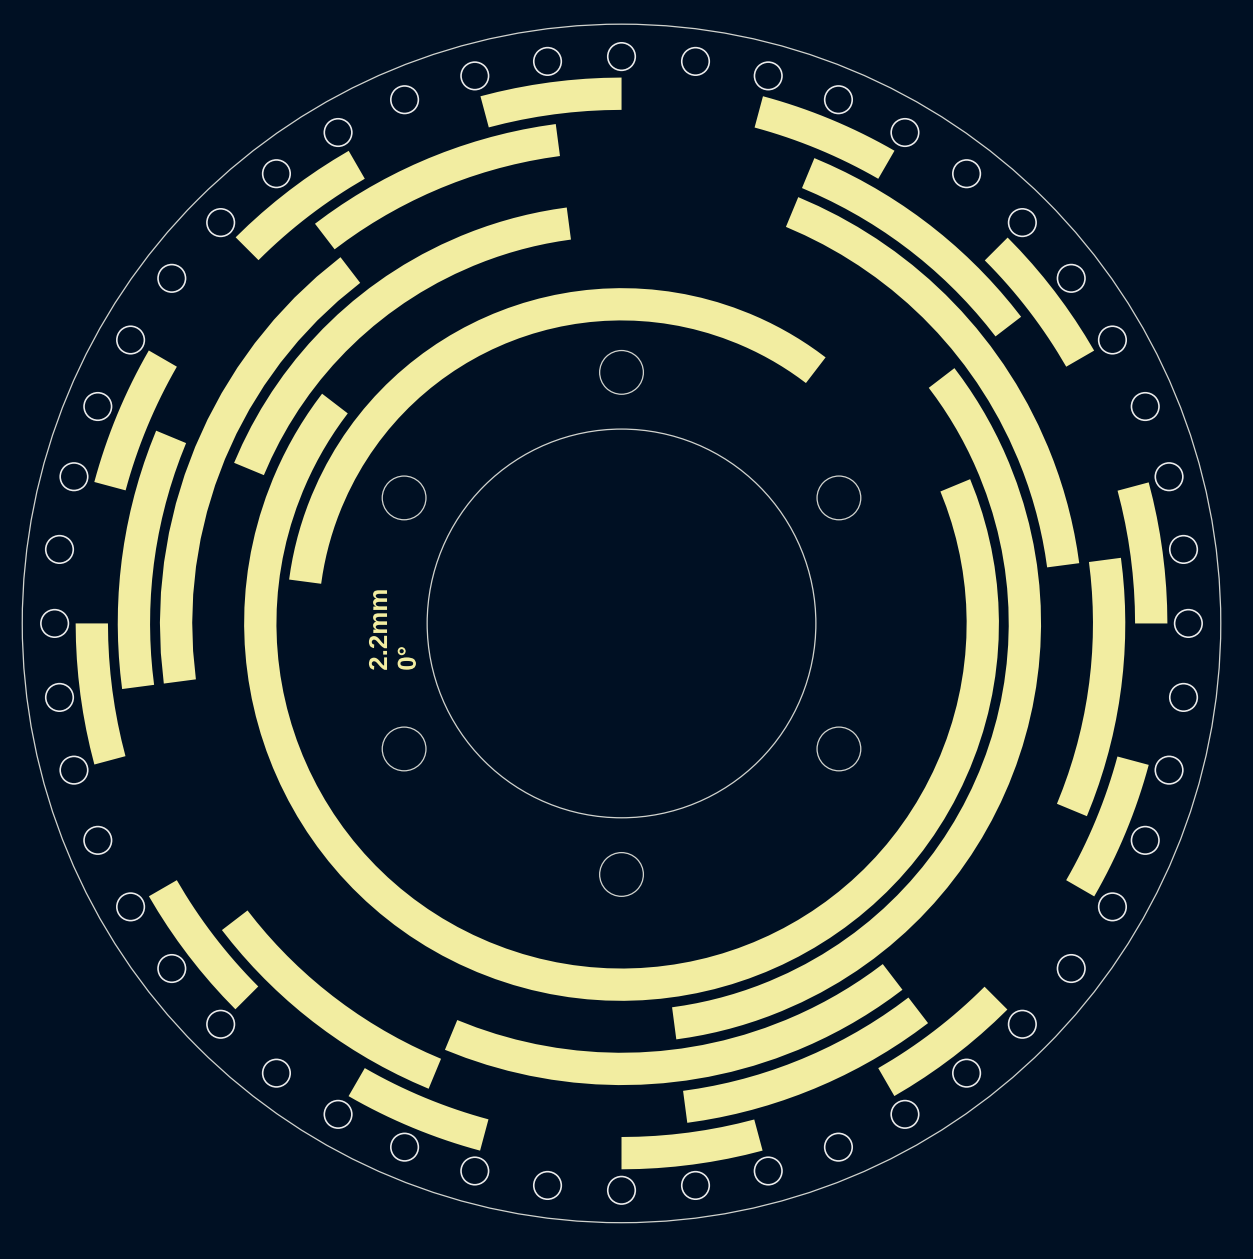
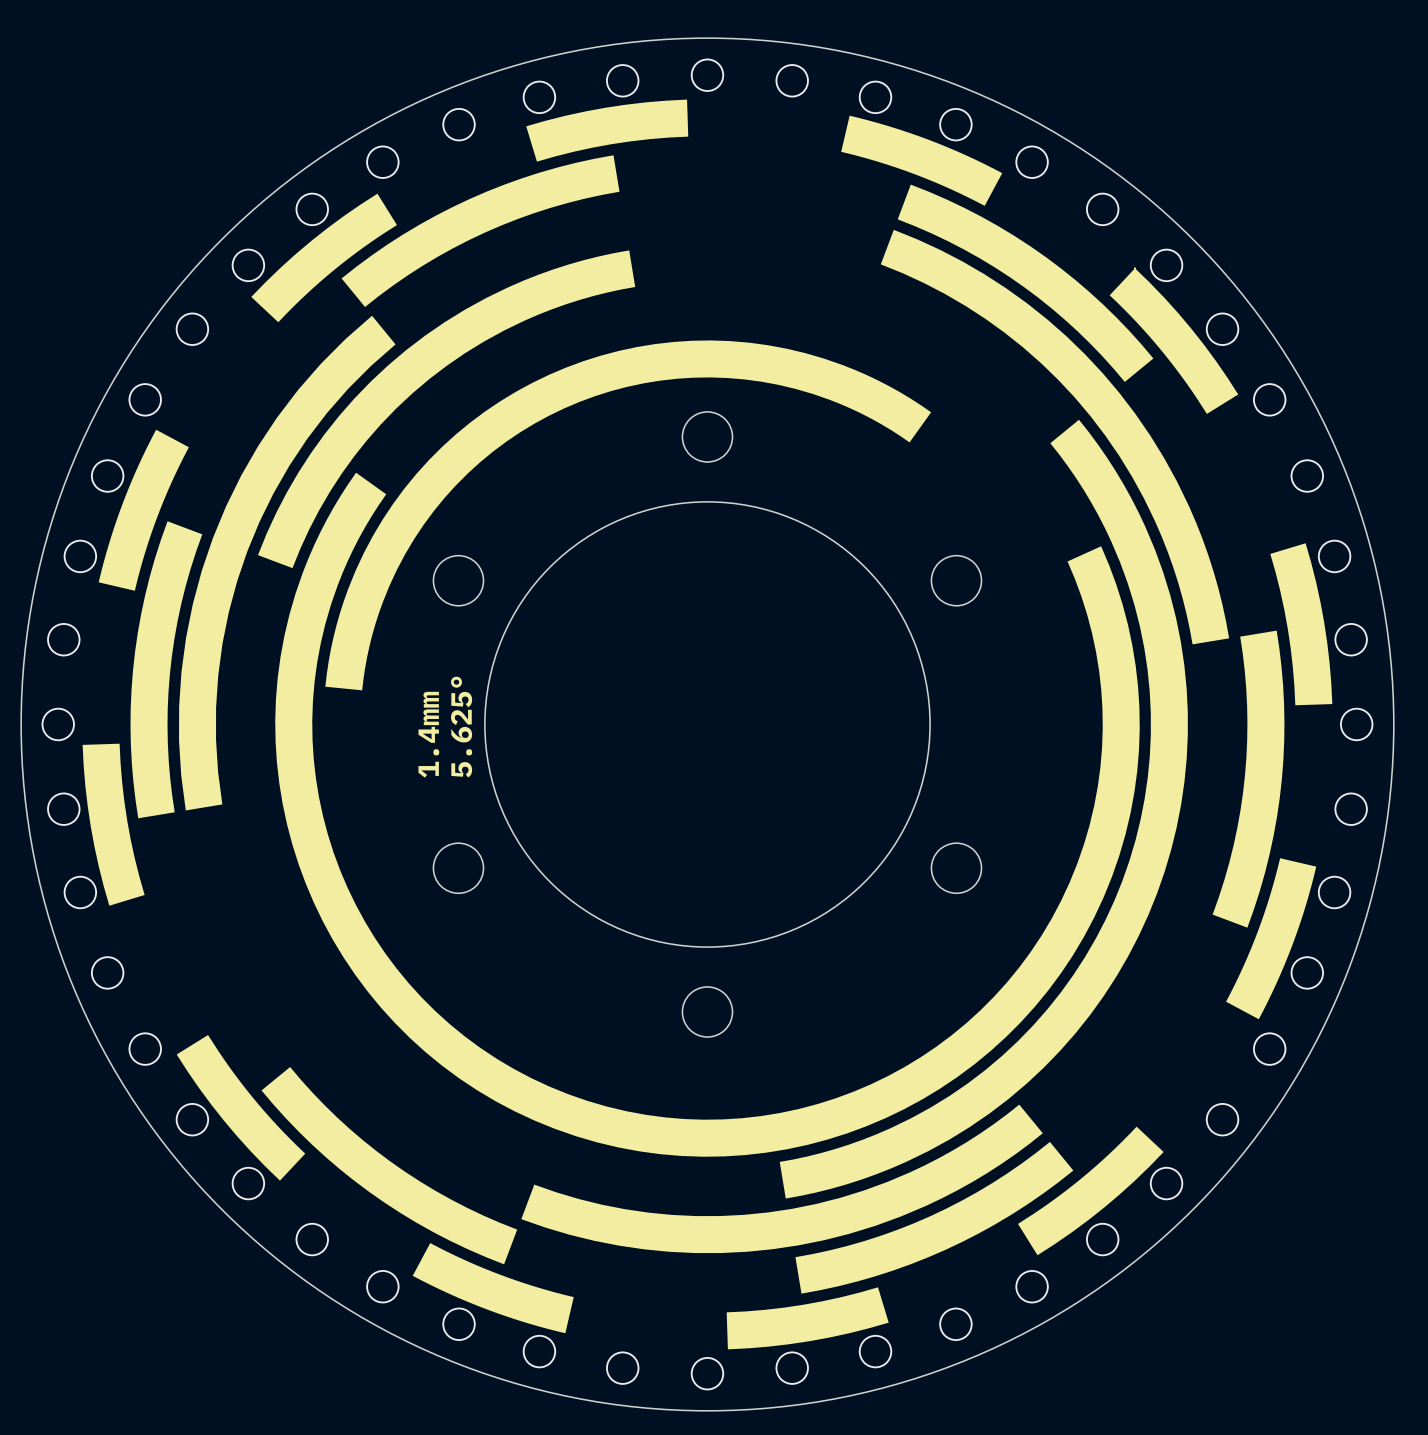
drawing shape: [75, 77, 1168, 1170] -> [82, 99, 1333, 1350]
text: 2.2mm (377, 630) -> 1.4mm (428, 734)
text: 0° (406, 658) -> 5.625° (461, 727)

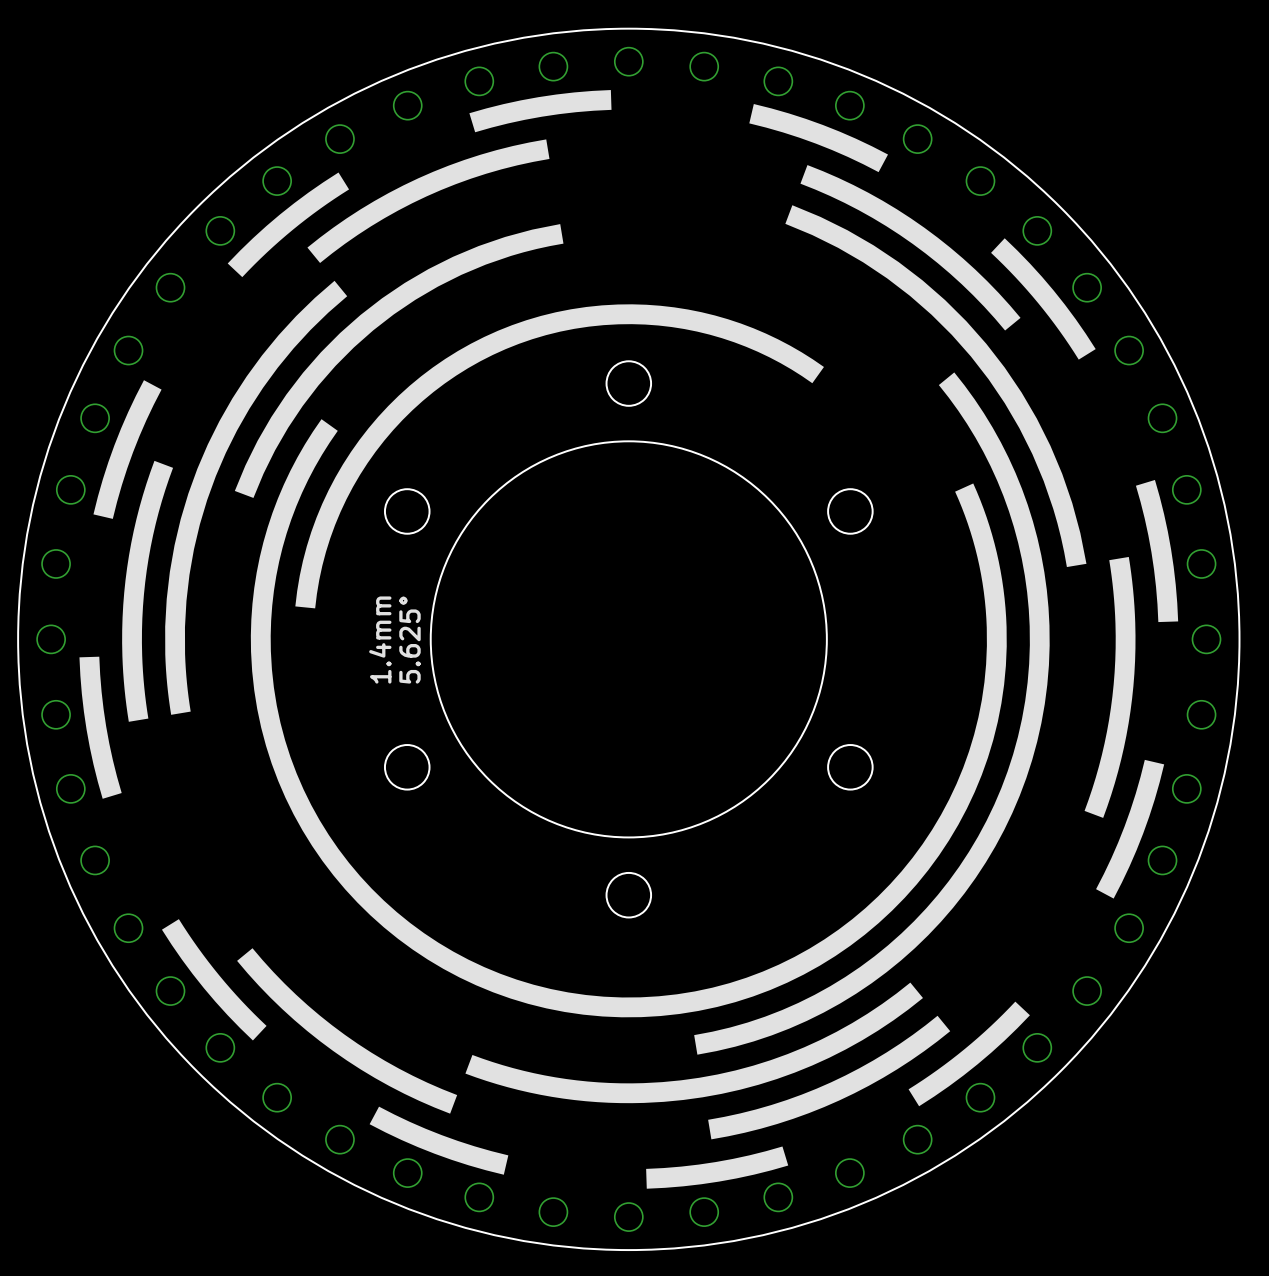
drawing shape: [82, 99, 1333, 1350] -> [79, 90, 1179, 1189]

